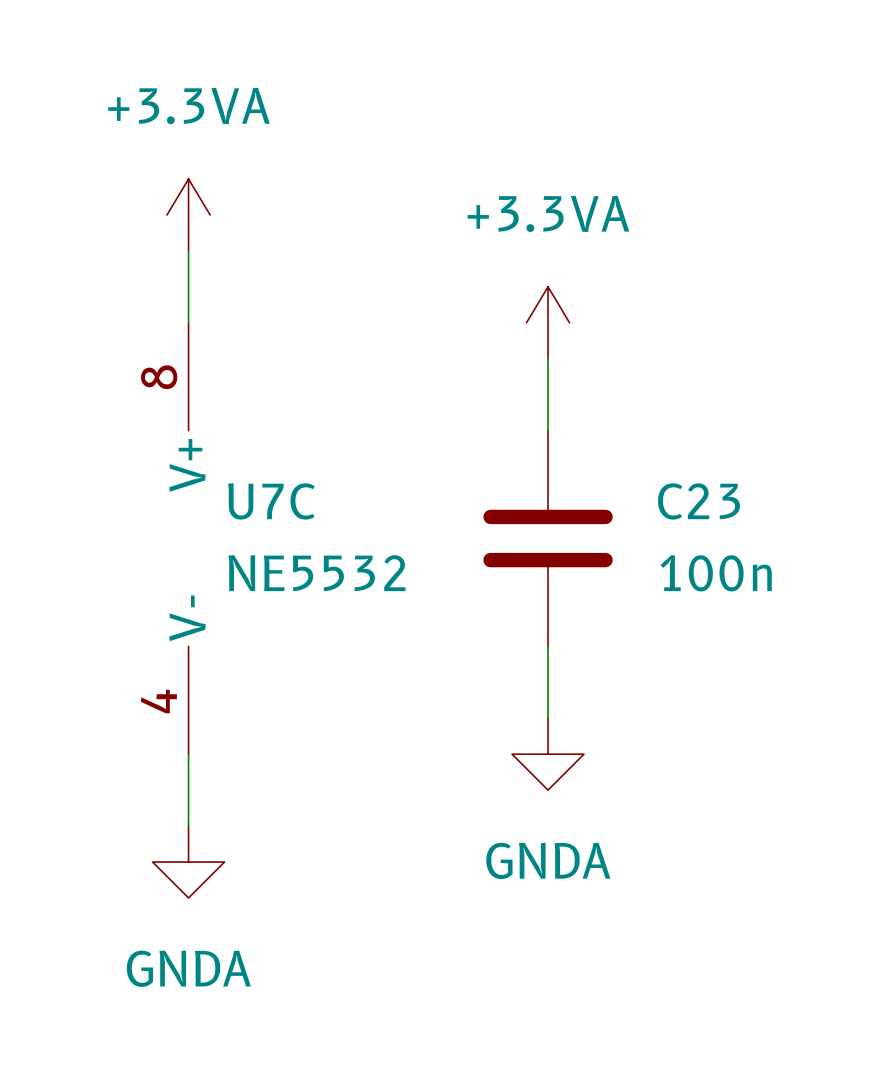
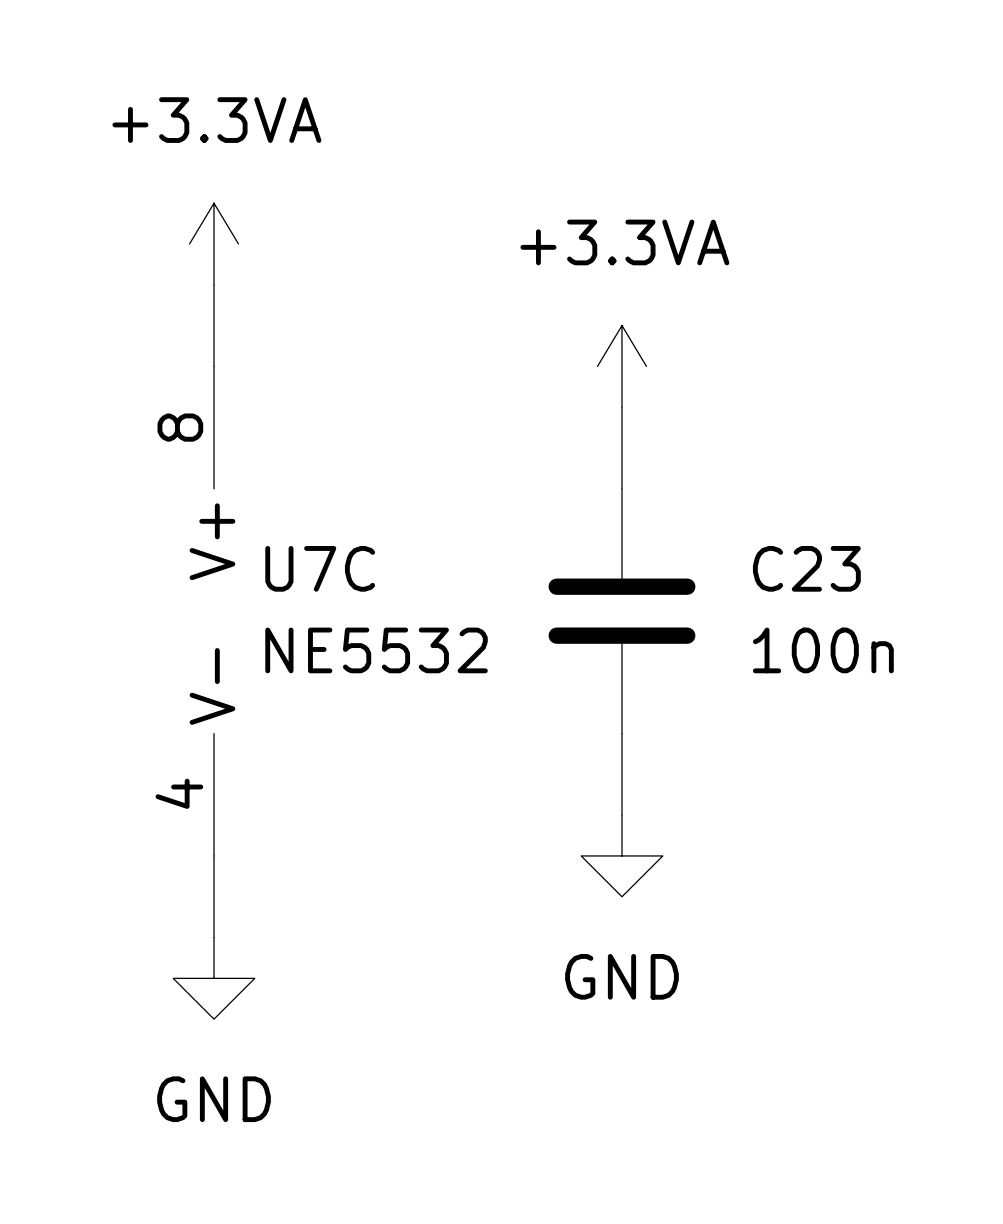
power symbol: GNDA (548, 754) -> GND (621, 855)
power symbol: GNDA (188, 862) -> GND (214, 978)

